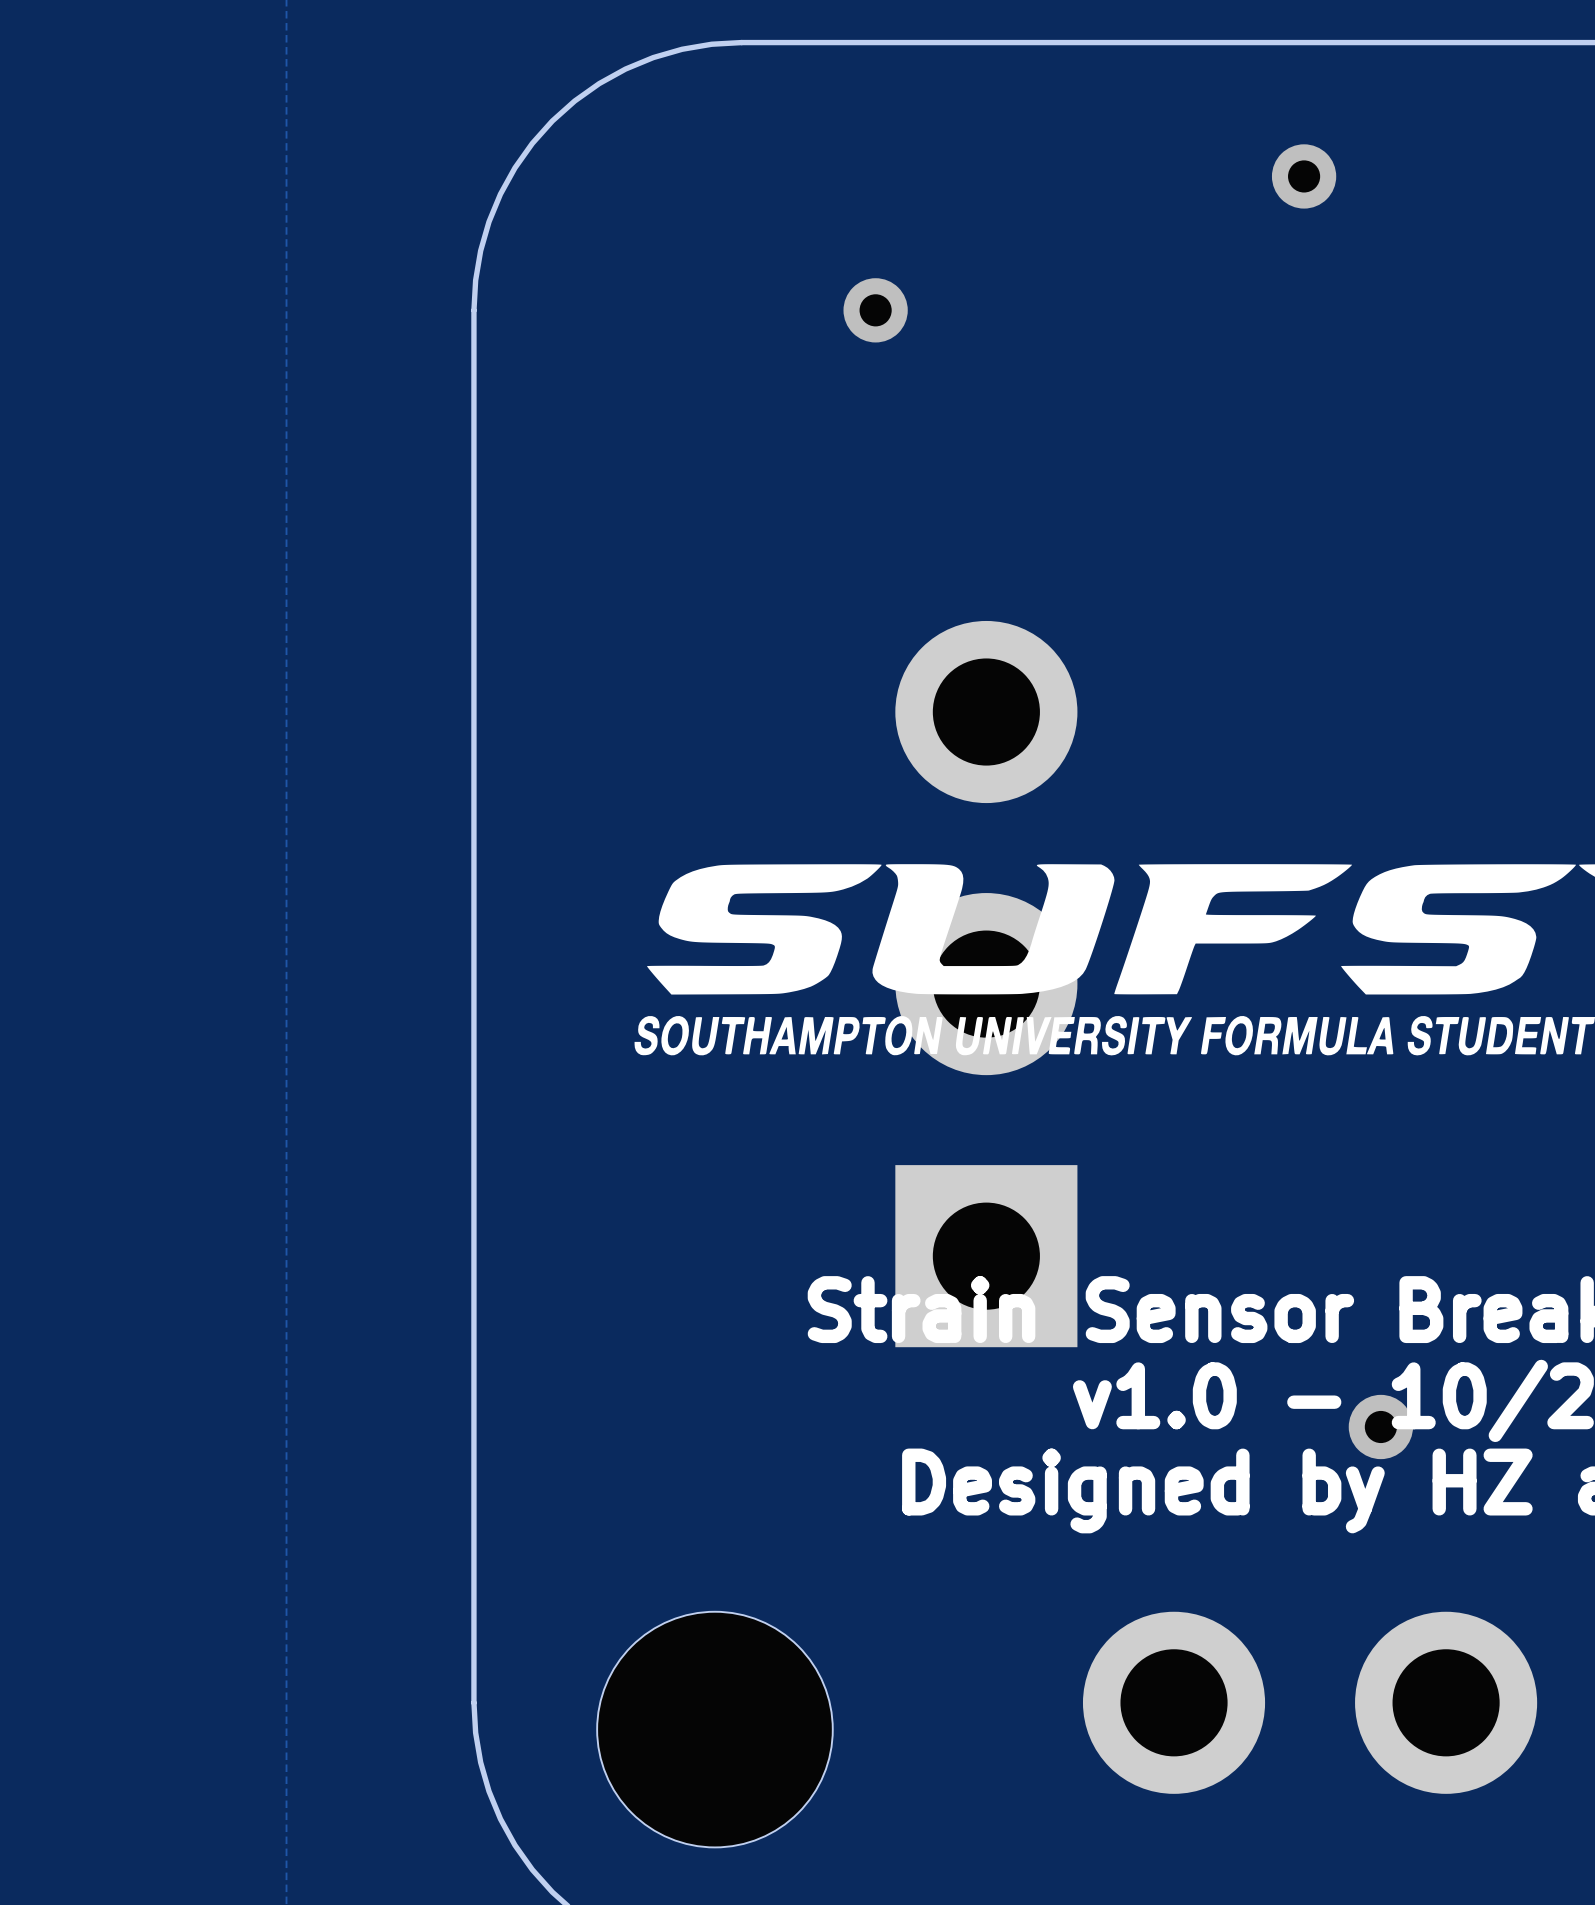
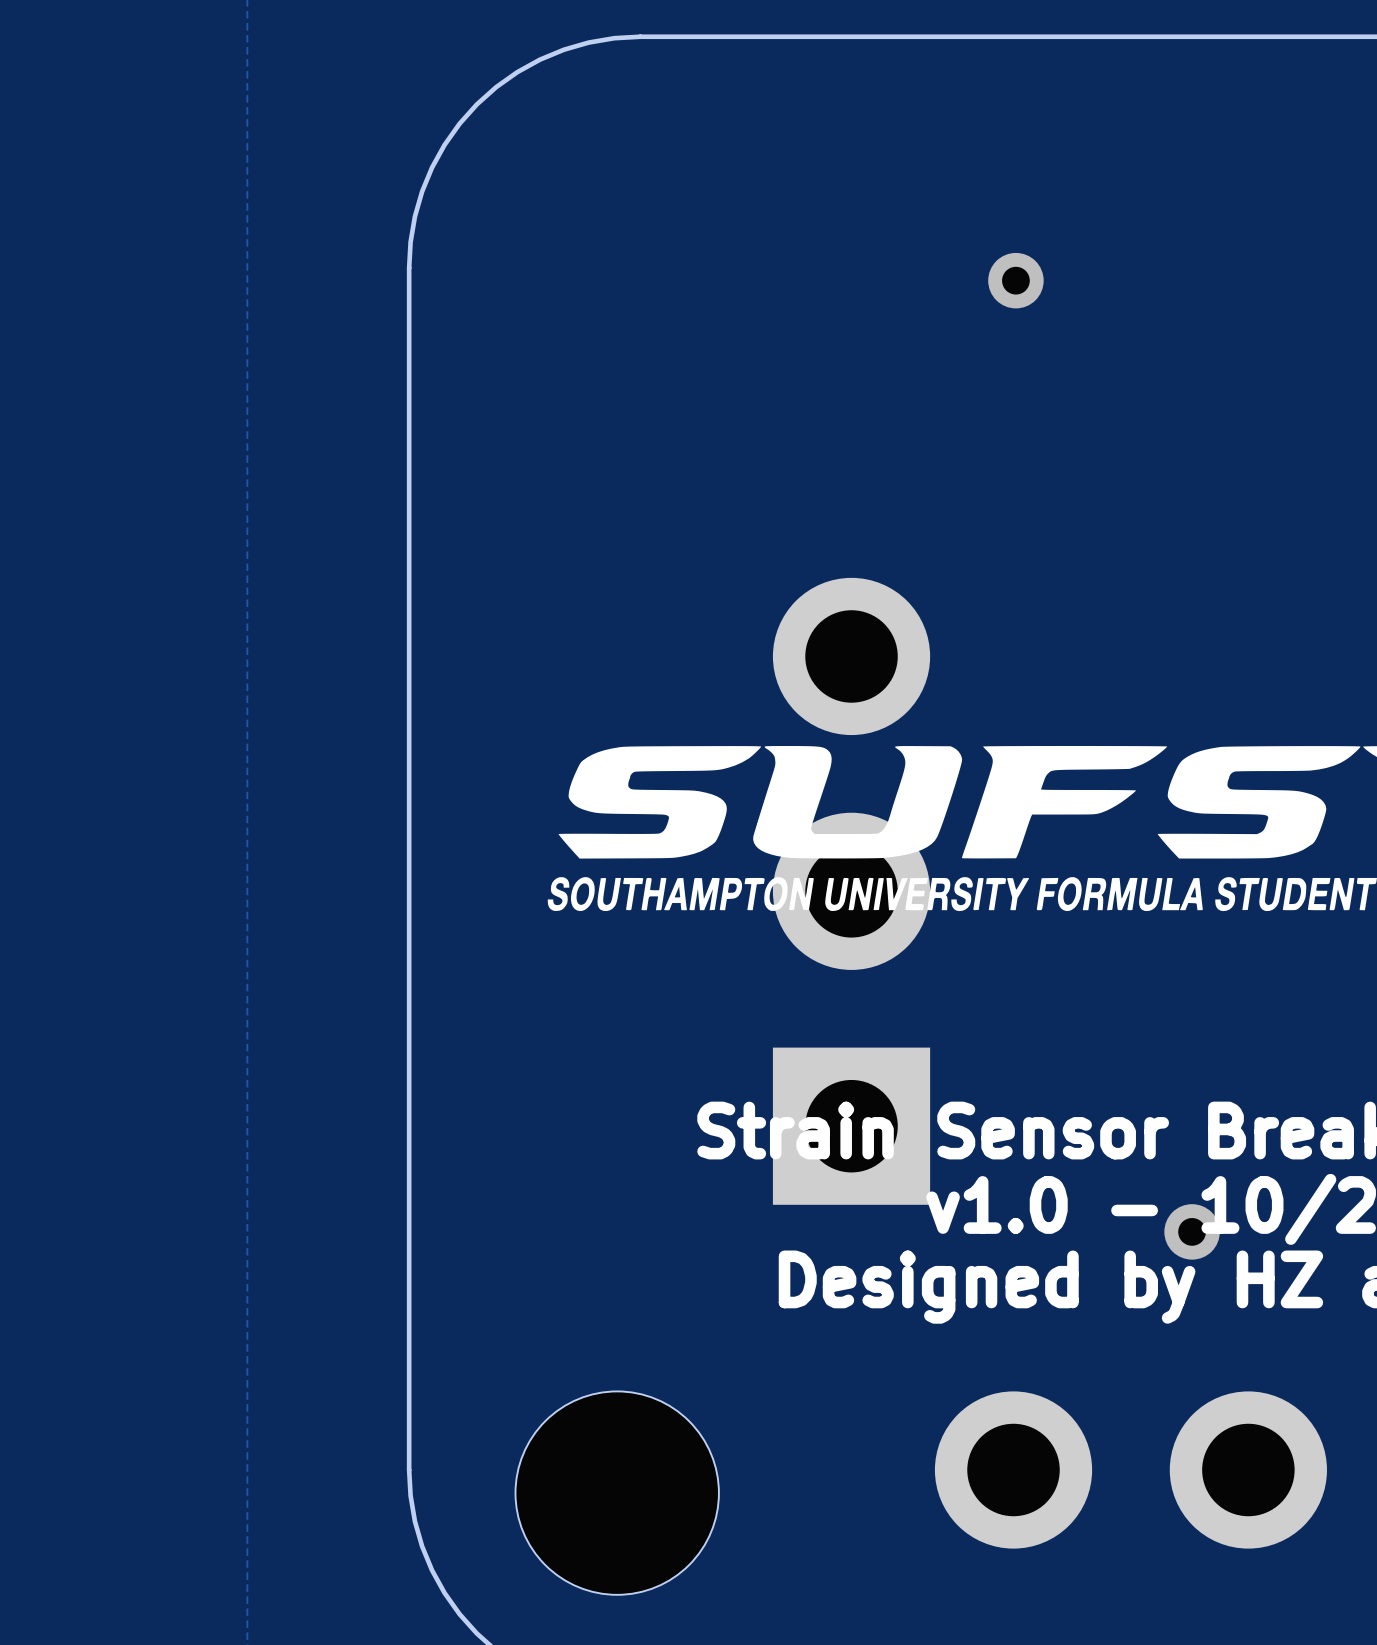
via: (1304, 176) -> none
via: (875, 310) -> none
via: none -> (1015, 280)
part position: (986, 984) -> (851, 891)

